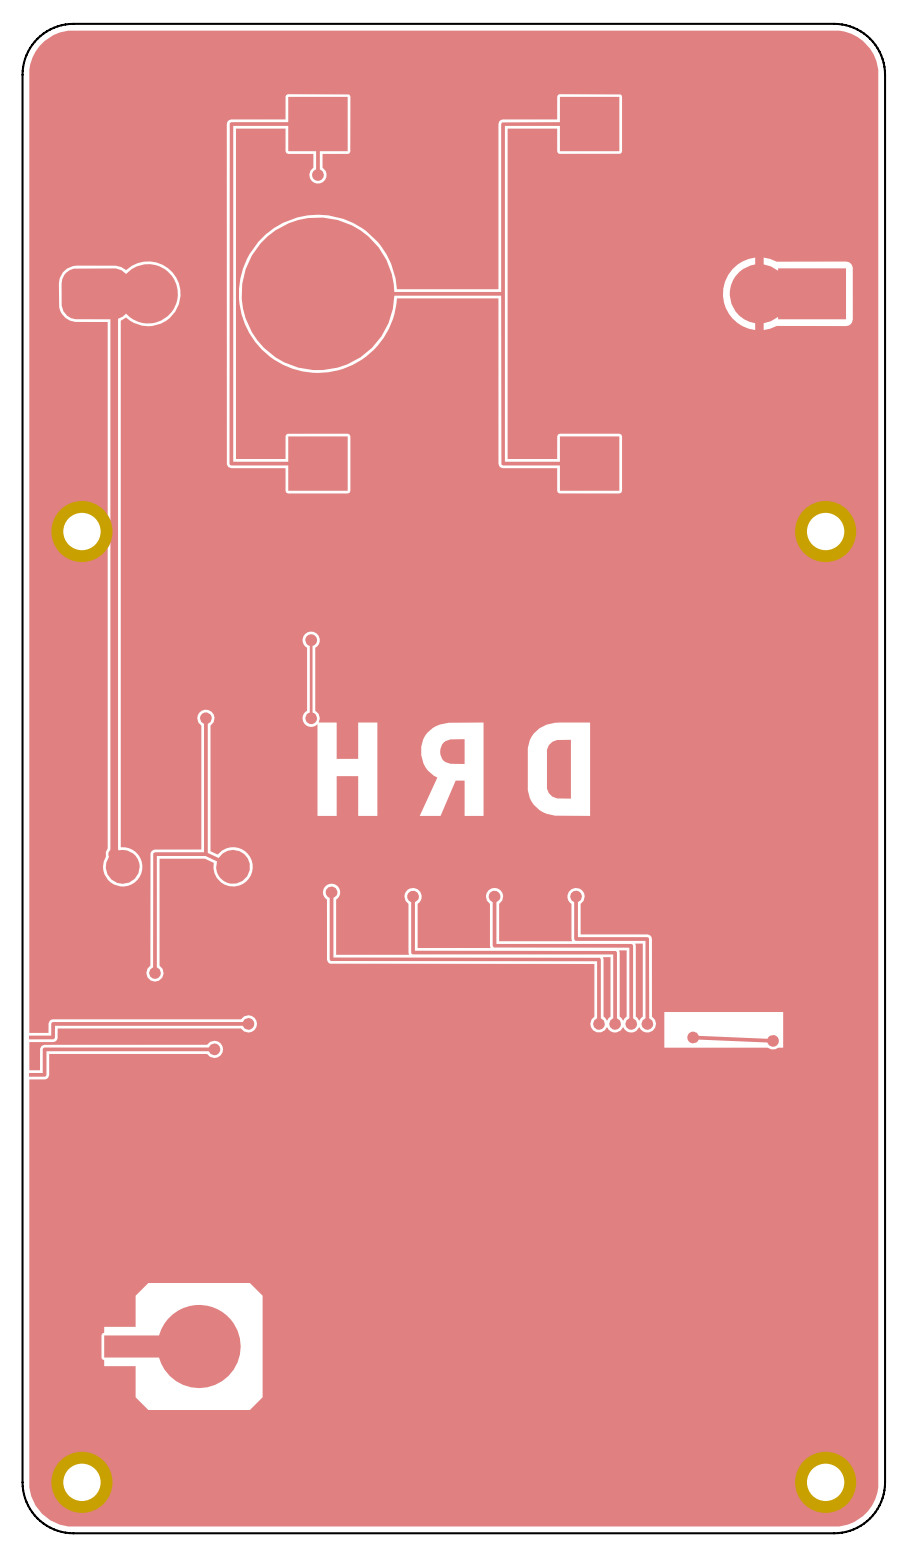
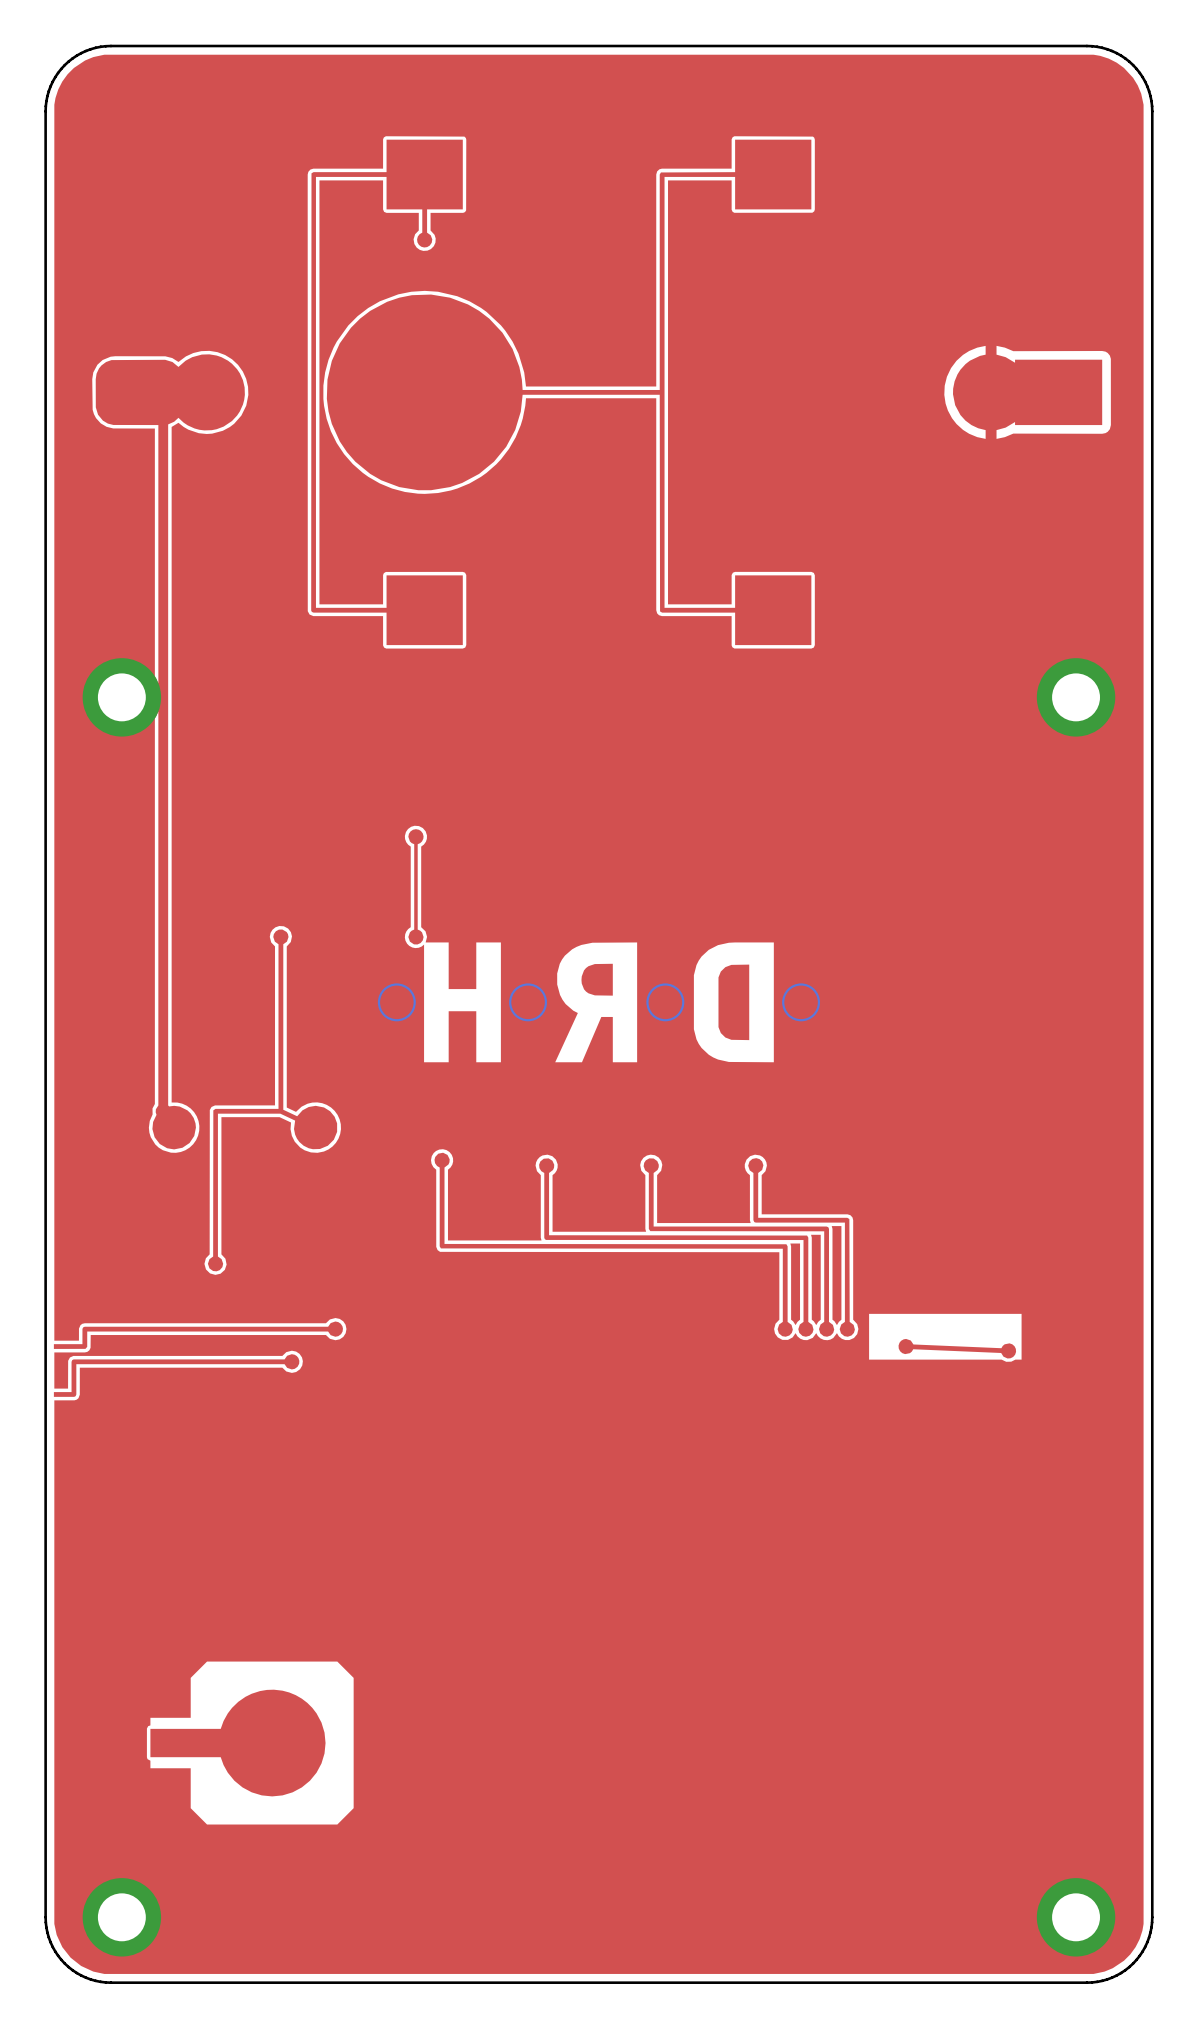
drawing: none -> [377, 983, 416, 1022]
drawing: none -> [509, 983, 548, 1022]
drawing: none -> [646, 983, 685, 1022]
drawing: none -> [782, 983, 821, 1022]

